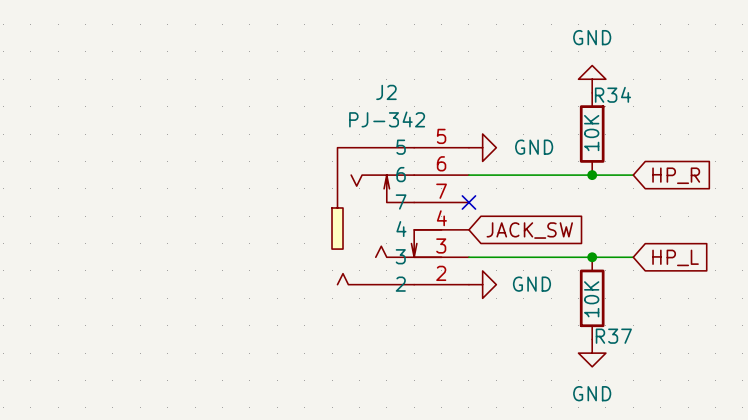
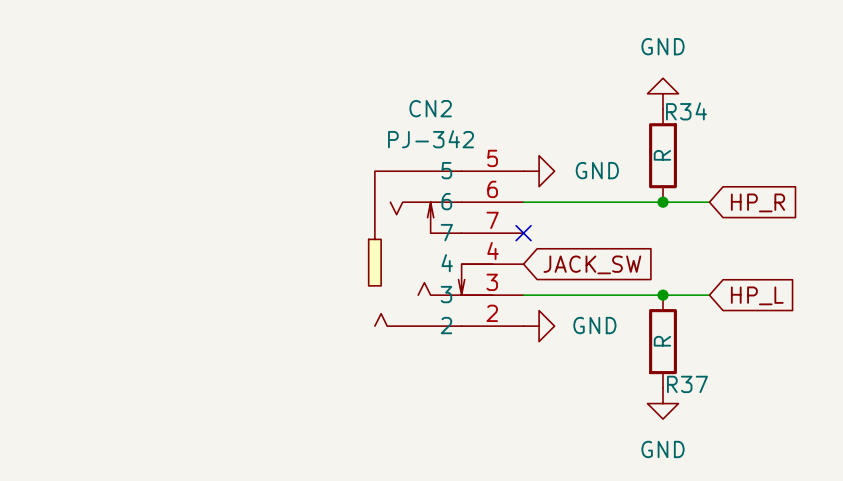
J2 name: J2 (386, 92) -> CN2 (430, 108)
R34 value: 10K (591, 133) -> R (662, 155)
R37 value: 10K (591, 299) -> R (662, 341)

